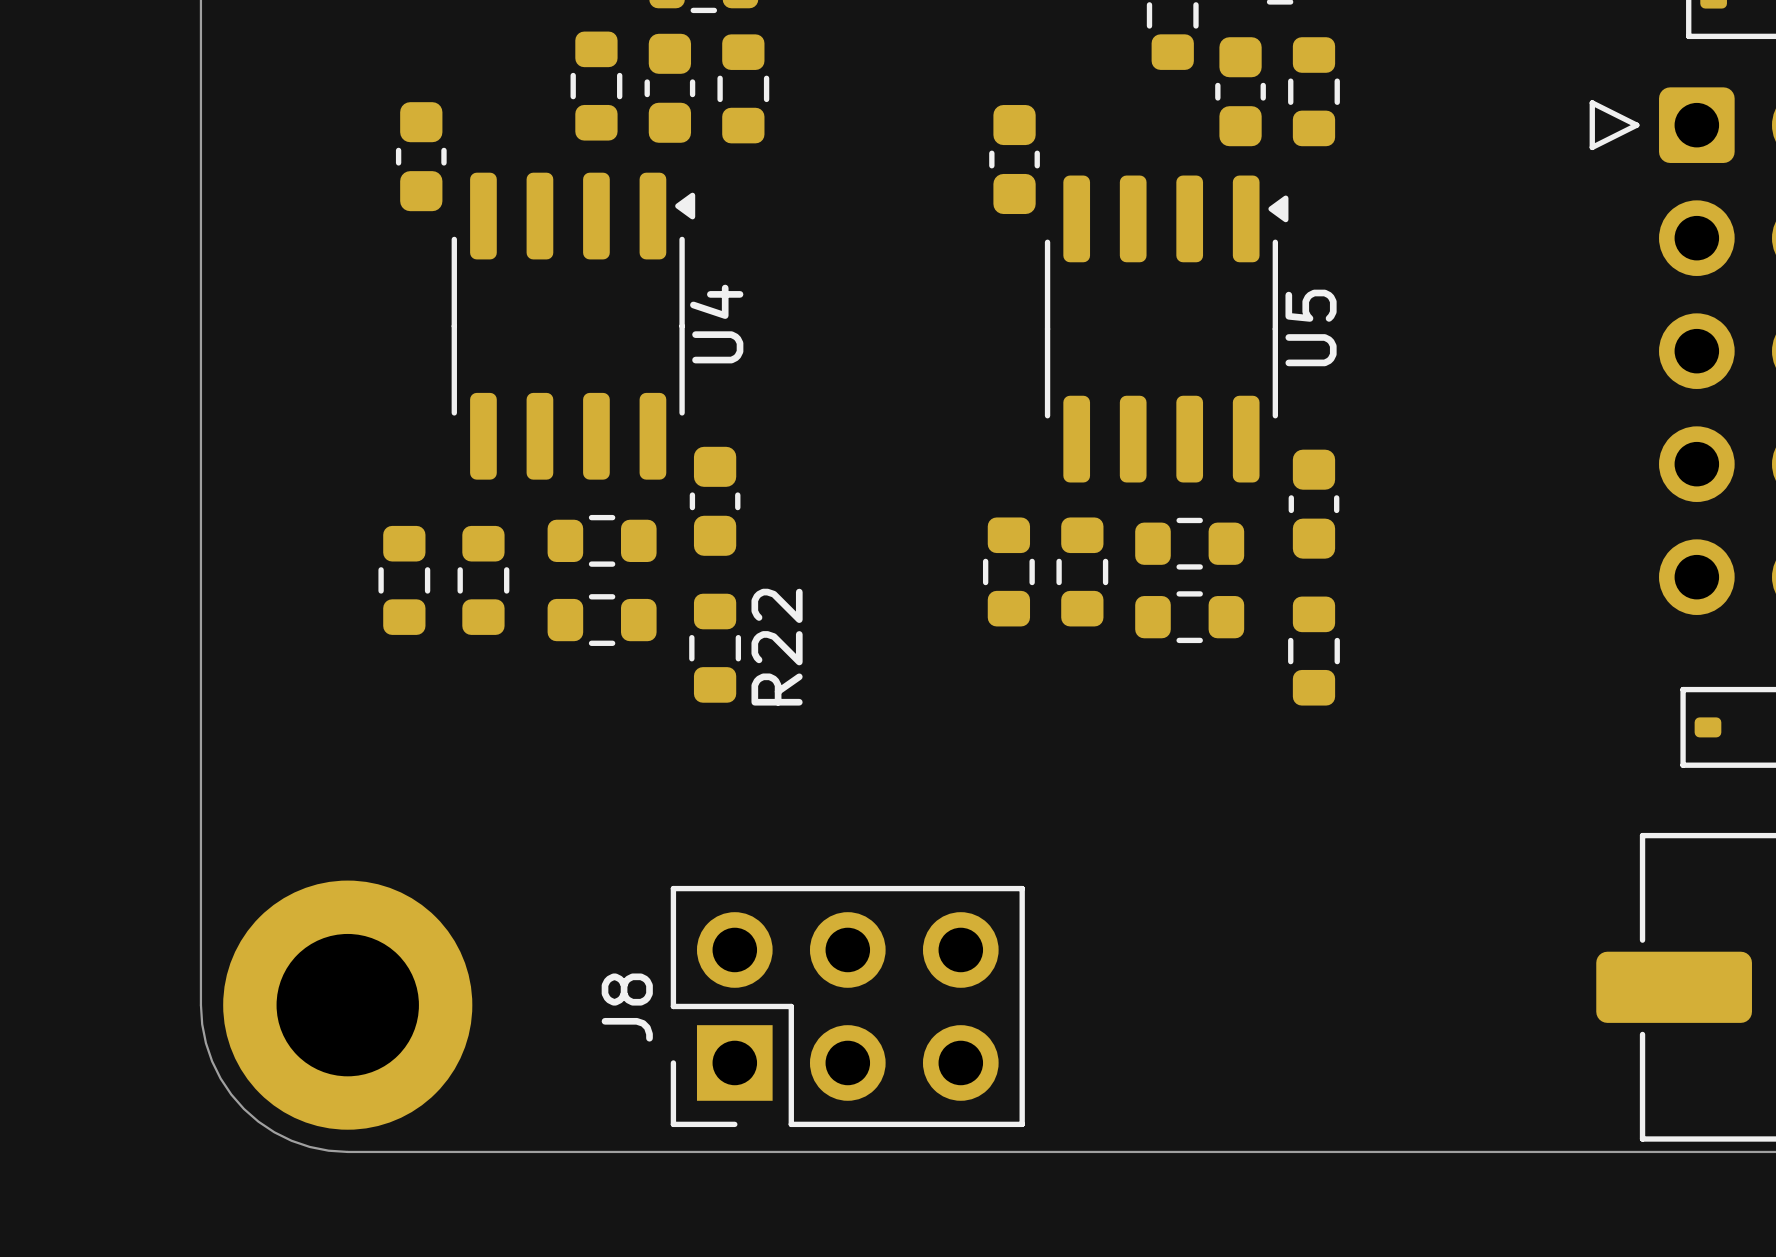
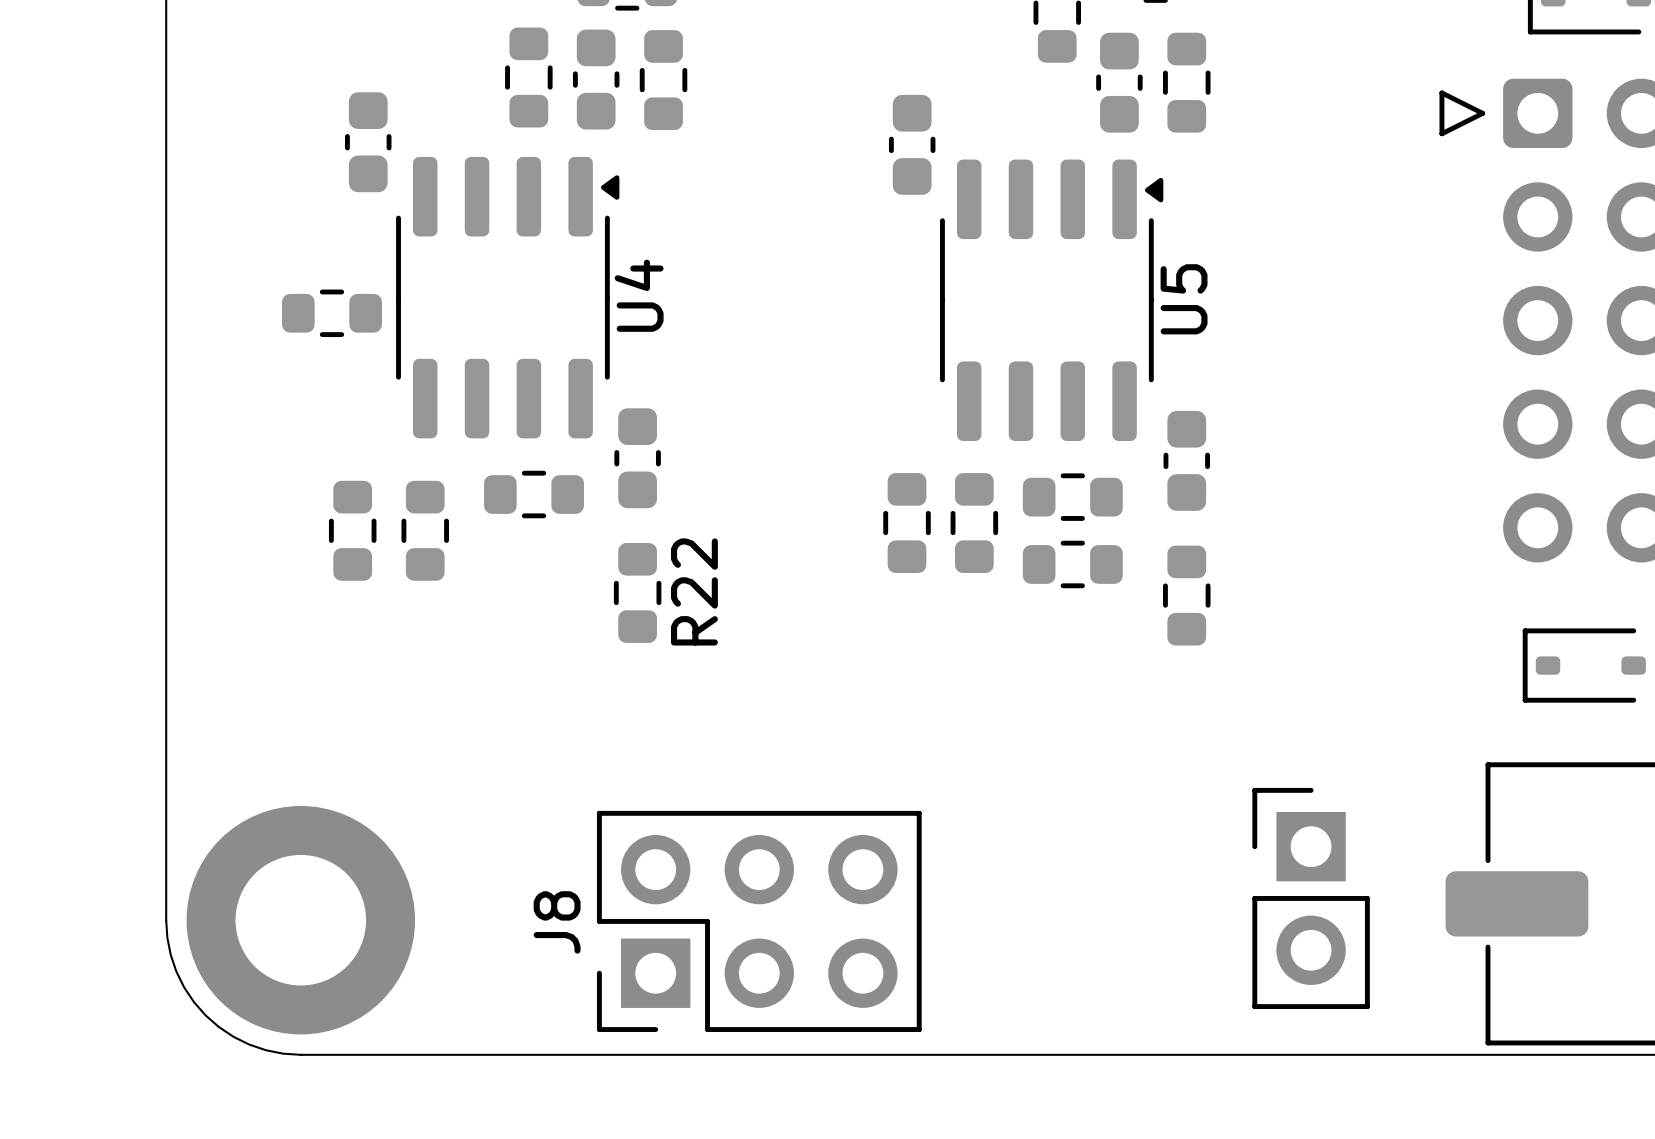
part position: (602, 620) -> (331, 313)
part: none -> (1311, 898)

